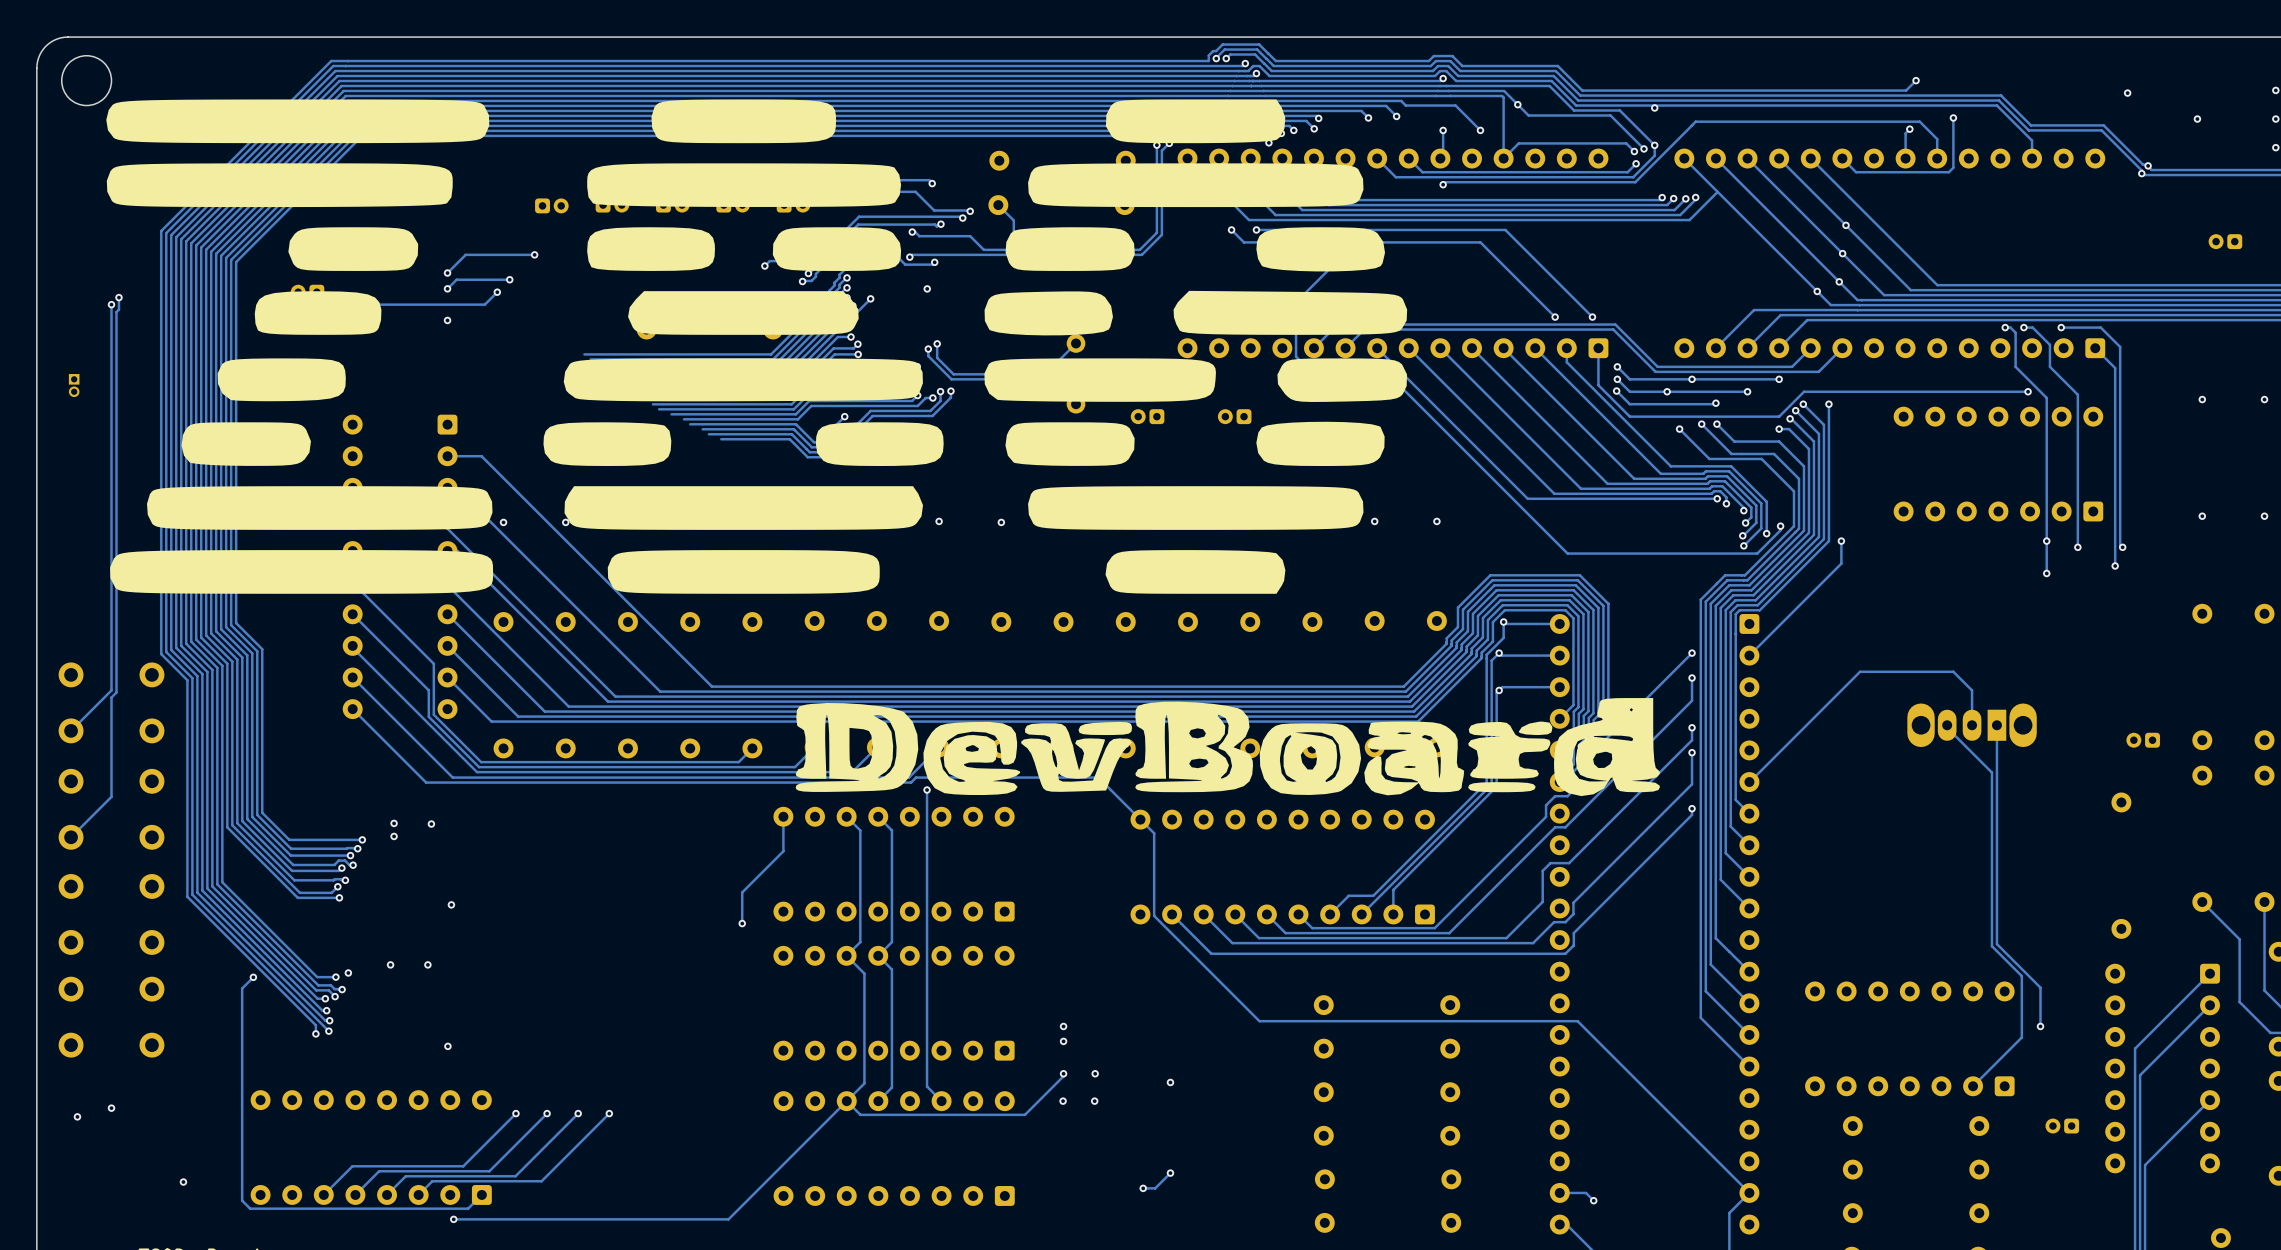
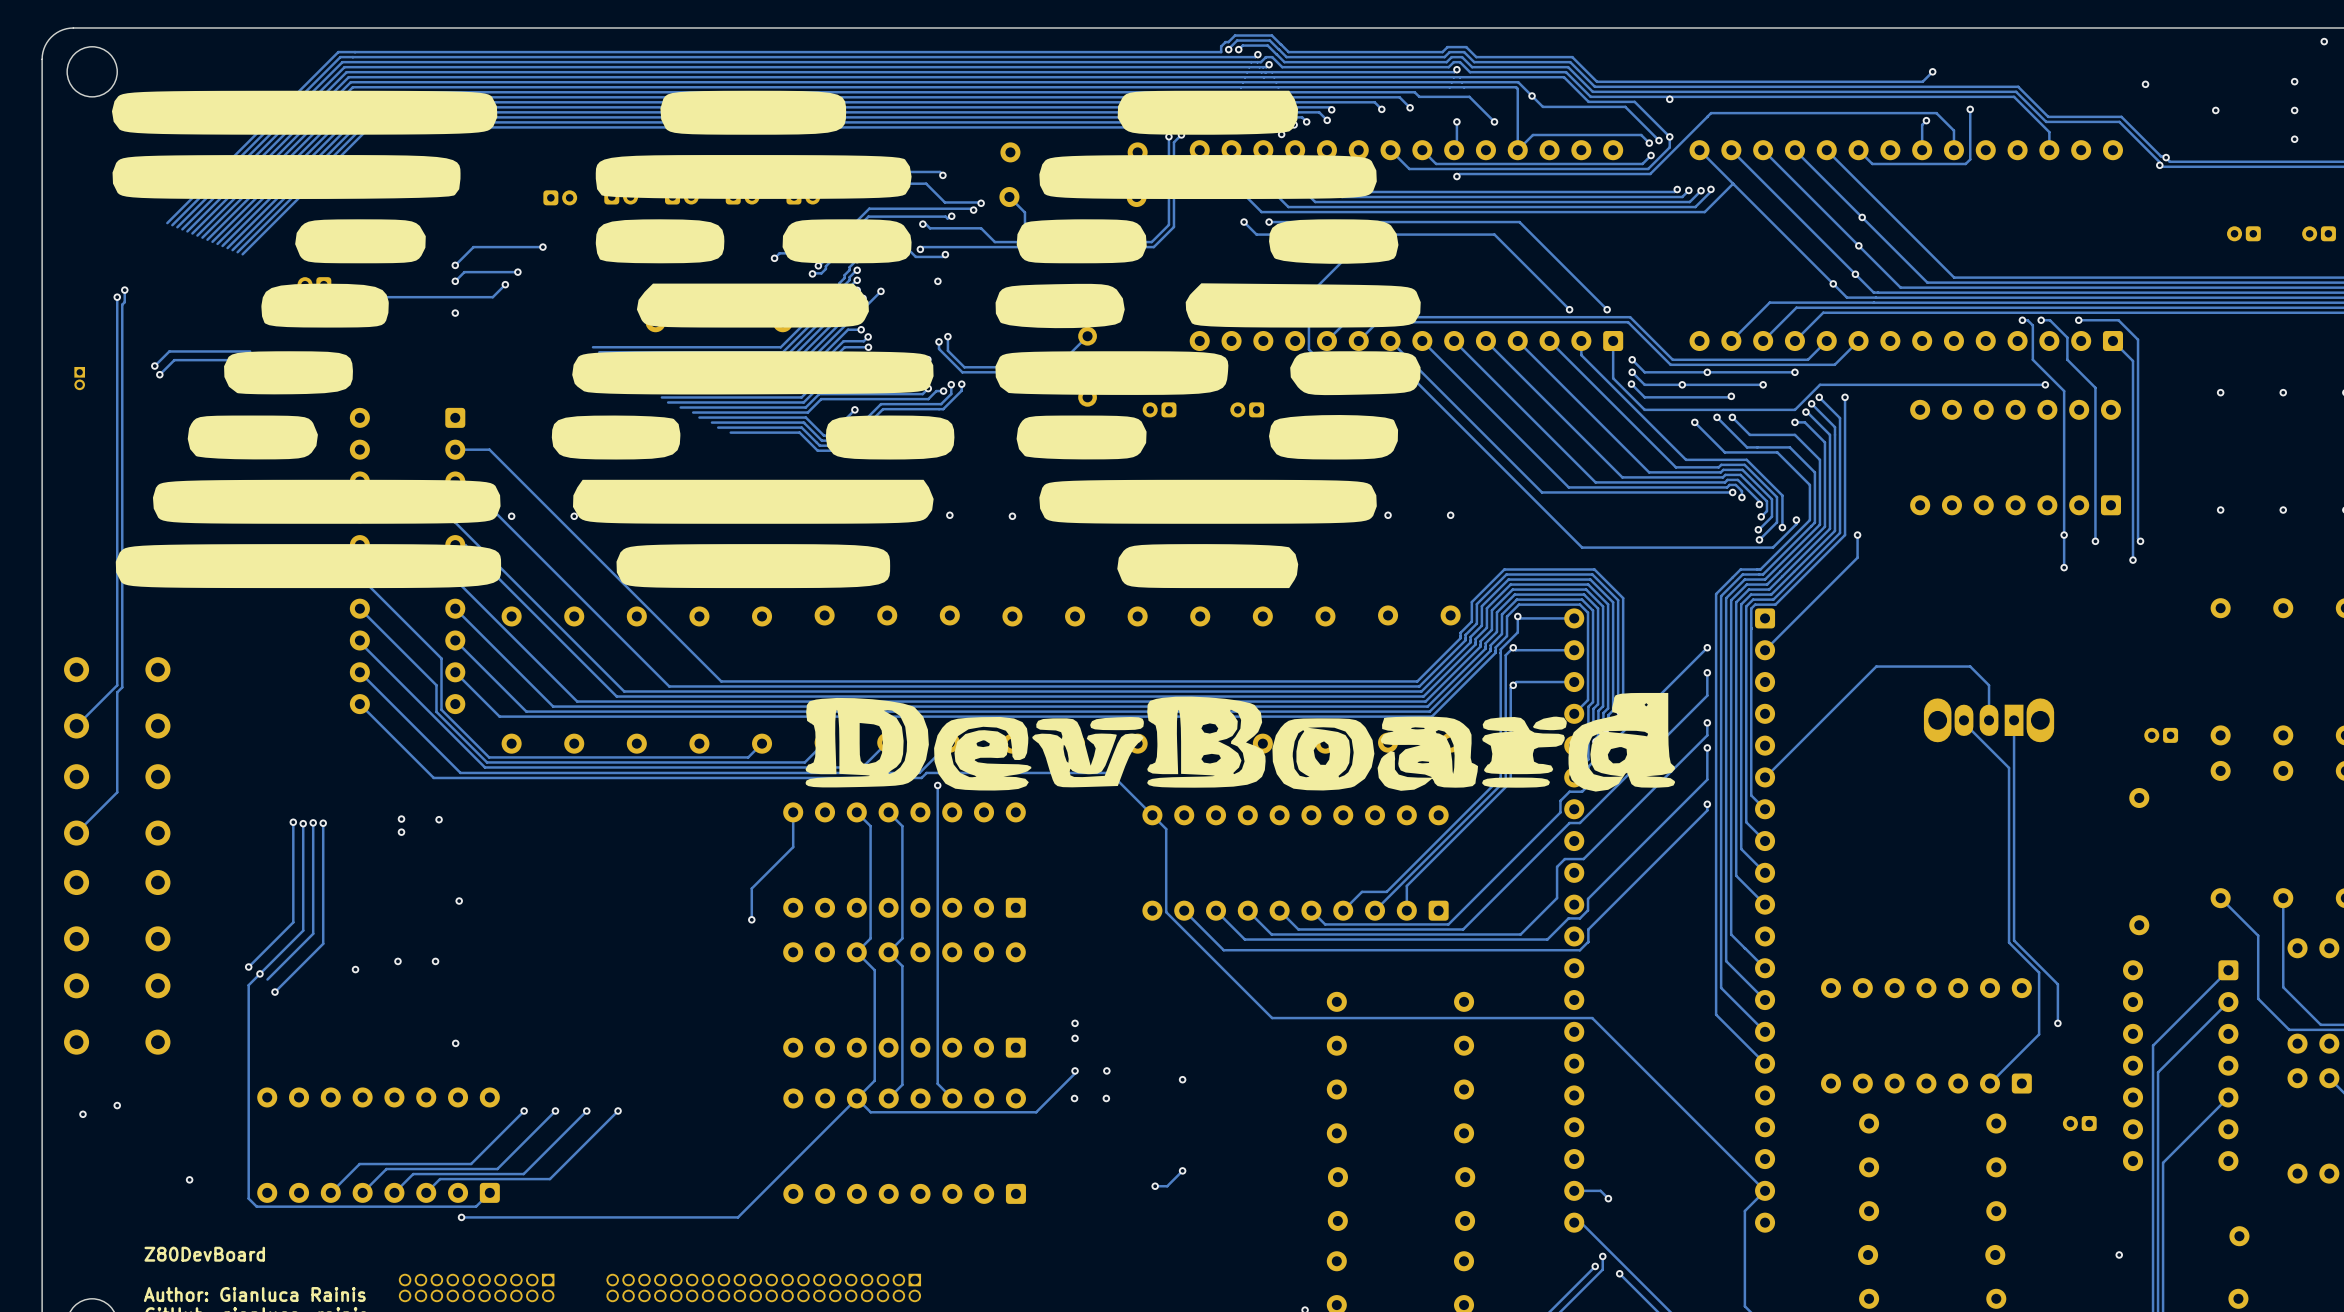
track: (161, 231) (161, 654) (187, 680) (187, 896) (315, 1025) (315, 1033) -> none
track: (166, 233) (166, 652) (192, 678) (192, 894) (328, 1031) -> none
track: (171, 235) (171, 649) (197, 676) (197, 892) (325, 1020) (328, 1021) -> none
track: (176, 237) (176, 647) (202, 674) (202, 890) (322, 1010) (326, 1010) -> none
track: (181, 239) (181, 645) (207, 671) (207, 888) (317, 998) (327, 999) -> none
track: (186, 241) (186, 643) (212, 669) (212, 886) (316, 990) (328, 990) (335, 996) -> none
track: (191, 243) (191, 641) (217, 667) (217, 884) (318, 985) (330, 985) (334, 989) (342, 989) -> none
track: (196, 245) (196, 639) (222, 665) (222, 882) (317, 977) (335, 977) -> none
track: (201, 247) (201, 637) (227, 663) (227, 827) (297, 897) (339, 897) -> none
track: (206, 249) (206, 635) (232, 661) (232, 825) (299, 892) (331, 892) (337, 886) (335, 886) -> none
track: (211, 251) (211, 633) (237, 659) (237, 823) (294, 880) (345, 880) -> none
track: (216, 253) (216, 631) (242, 657) (242, 821) (292, 870) (339, 870) (341, 868) -> none
track: (221, 255) (221, 629) (247, 655) (247, 819) (293, 864) (334, 864) (338, 860) (344, 860) (349, 865) (353, 865) -> none
track: (226, 257) (226, 627) (252, 653) (252, 817) (290, 855) (350, 855) -> none
track: (231, 259) (231, 625) (257, 651) (257, 814) (291, 848) (357, 848) -> none
track: (236, 262) (236, 623) (262, 649) (262, 812) (289, 839) (362, 839) -> none
track: none -> (250, 351) (169, 351) (154, 366)
track: none -> (255, 360) (174, 360) (159, 374)
via: none -> (154, 366)
via: none -> (159, 374)
track: none -> (293, 822) (293, 922) (248, 967)
via: none -> (293, 822)
track: none -> (303, 823) (303, 930) (259, 973)
via: none -> (303, 823)
track: none -> (313, 822) (313, 933) (267, 979)
via: none -> (313, 822)
track: none -> (323, 823) (323, 943) (274, 992)
via: none -> (323, 823)
via: (362, 839) -> none
via: (357, 848) -> none
via: (350, 855) -> none
via: (353, 865) -> none
via: (341, 868) -> none
via: (345, 880) -> none
via: (337, 886) -> none
via: (339, 897) -> none
via: none -> (248, 967)
via: (335, 977) -> none
via: (342, 989) -> none
via: none -> (274, 992)
via: (335, 996) -> none
via: (325, 998) -> none
via: (326, 1010) -> none
via: (329, 1020) -> none
via: (328, 1031) -> none
via: (315, 1033) -> none

